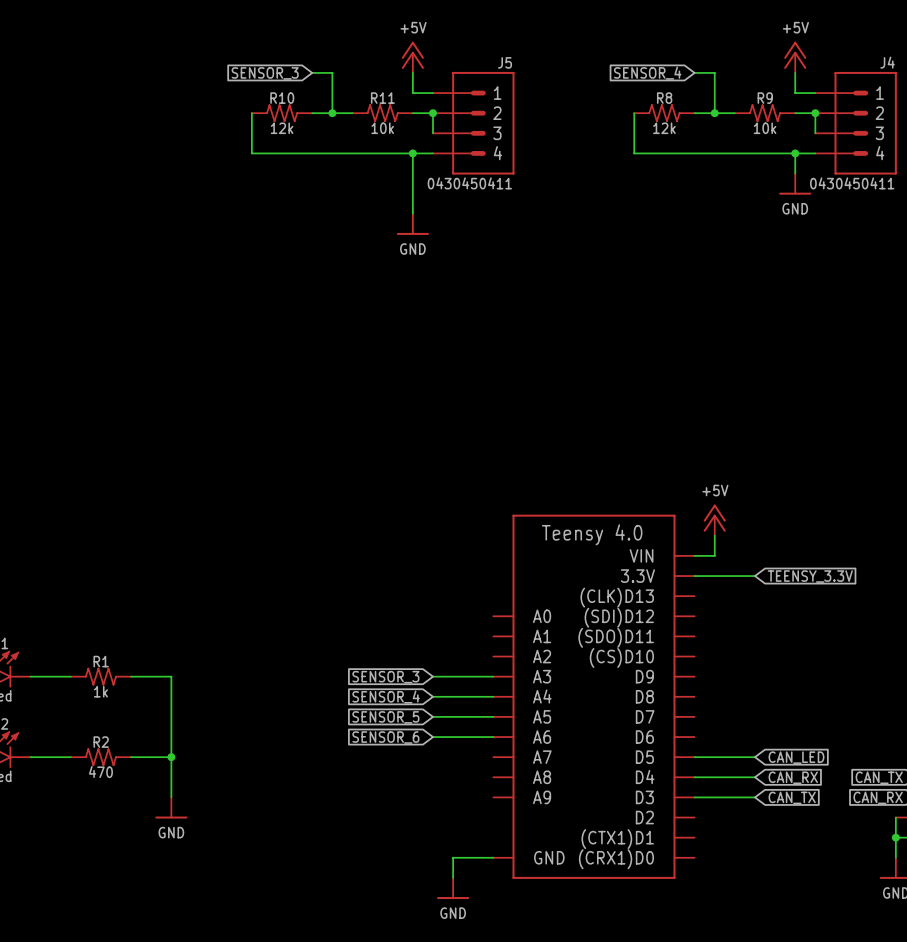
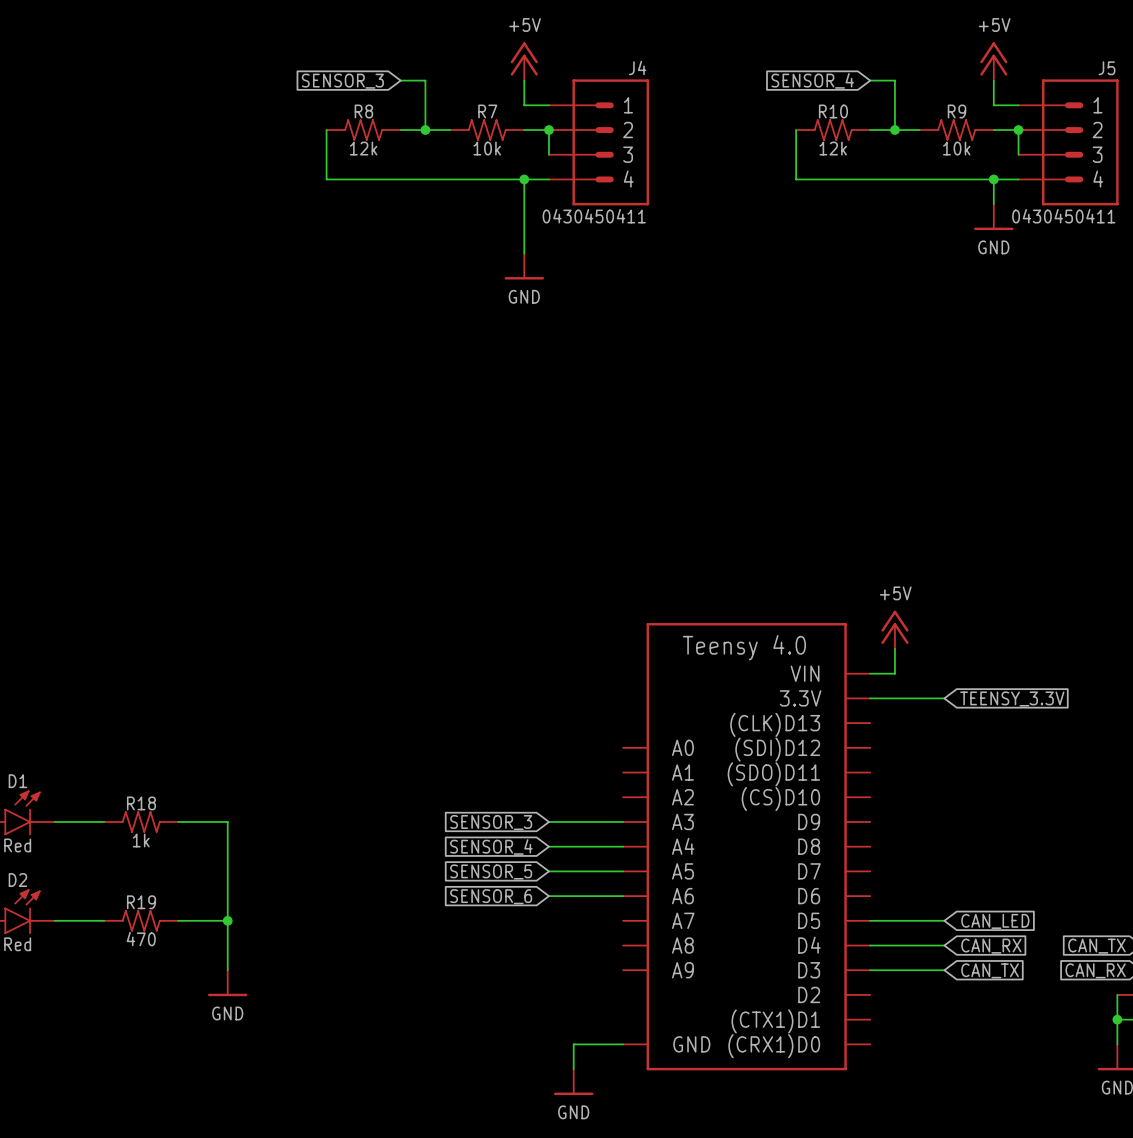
J5 name: J5 (504, 62) -> J4 (637, 67)
J4 name: J4 (887, 62) -> J5 (1106, 68)
R10 name: R10 (282, 98) -> R8 (363, 111)
R11 name: R11 (382, 98) -> R7 (487, 111)
R8 name: R8 (664, 98) -> R10 (833, 111)
R1 name: R1 (101, 661) -> R18 (141, 803)
R2 name: R2 (101, 742) -> R19 (141, 902)

